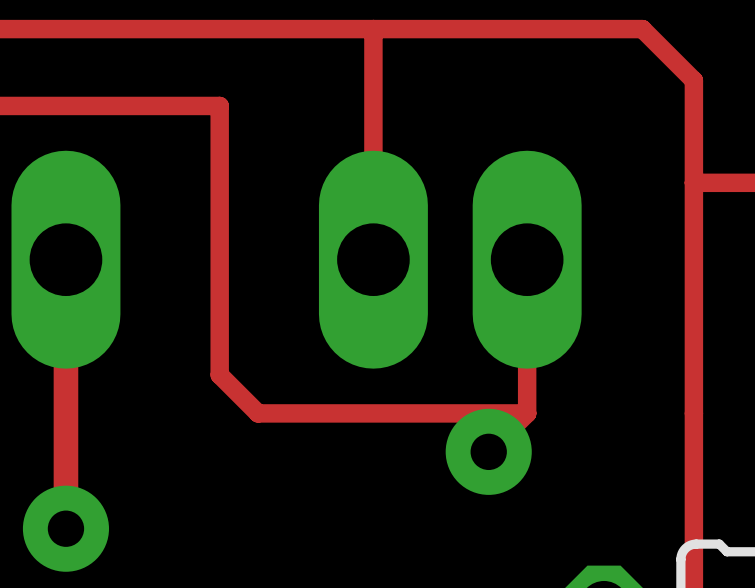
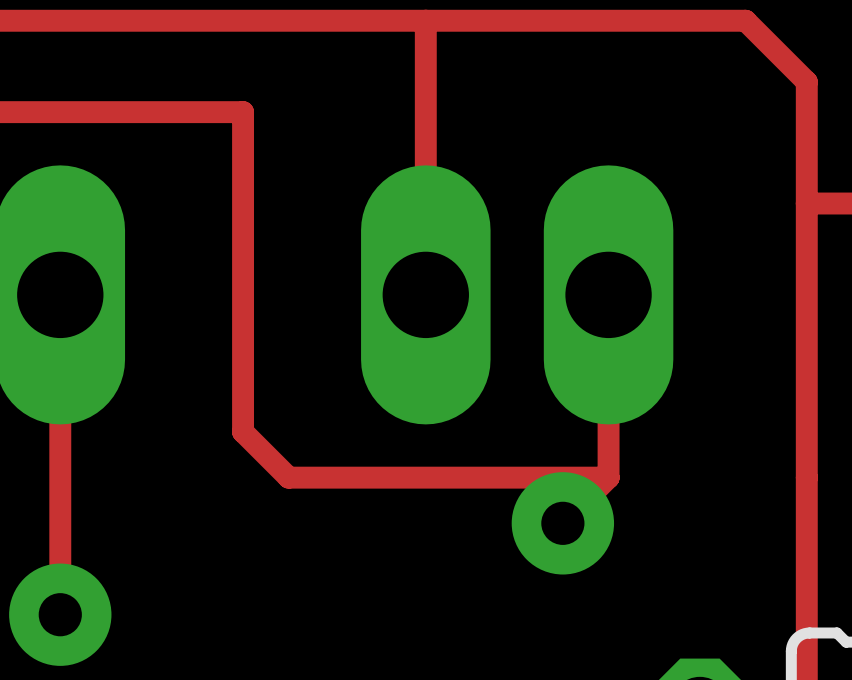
track width: thick (65, 259) (65, 528) -> thin (60, 294) (60, 614)

